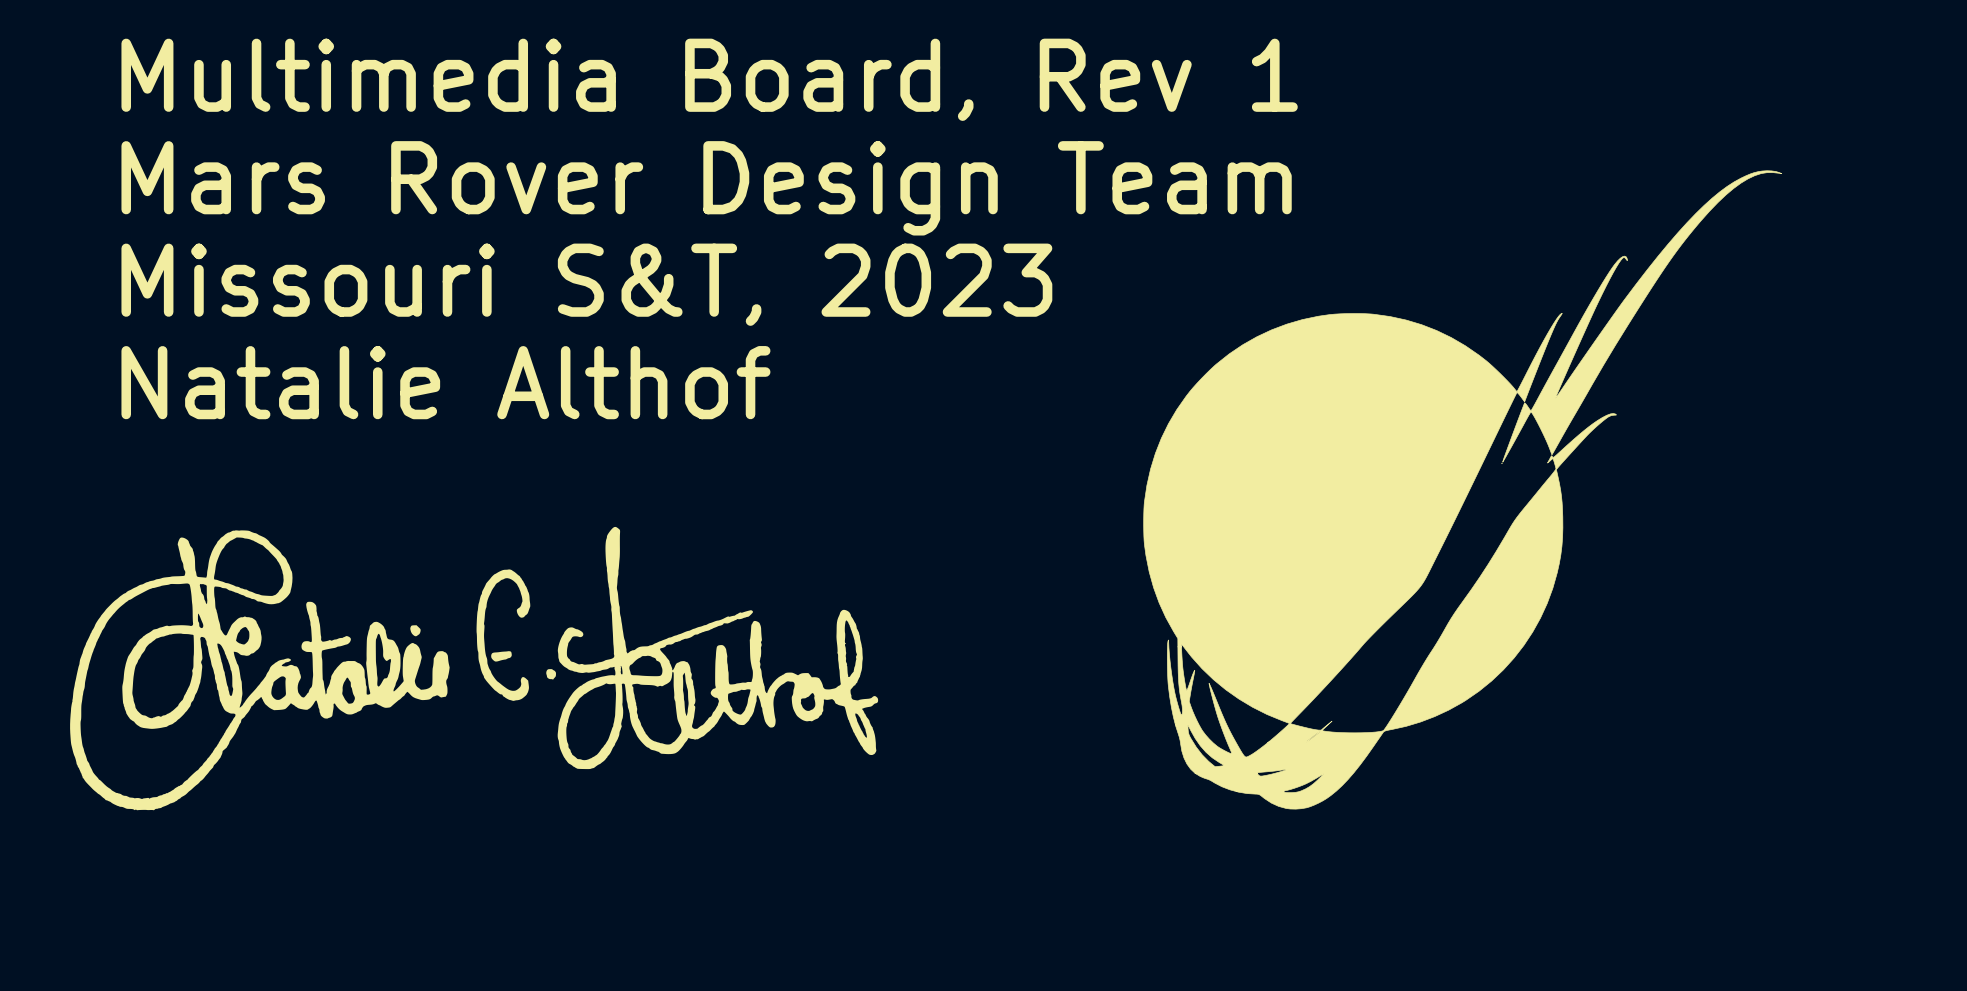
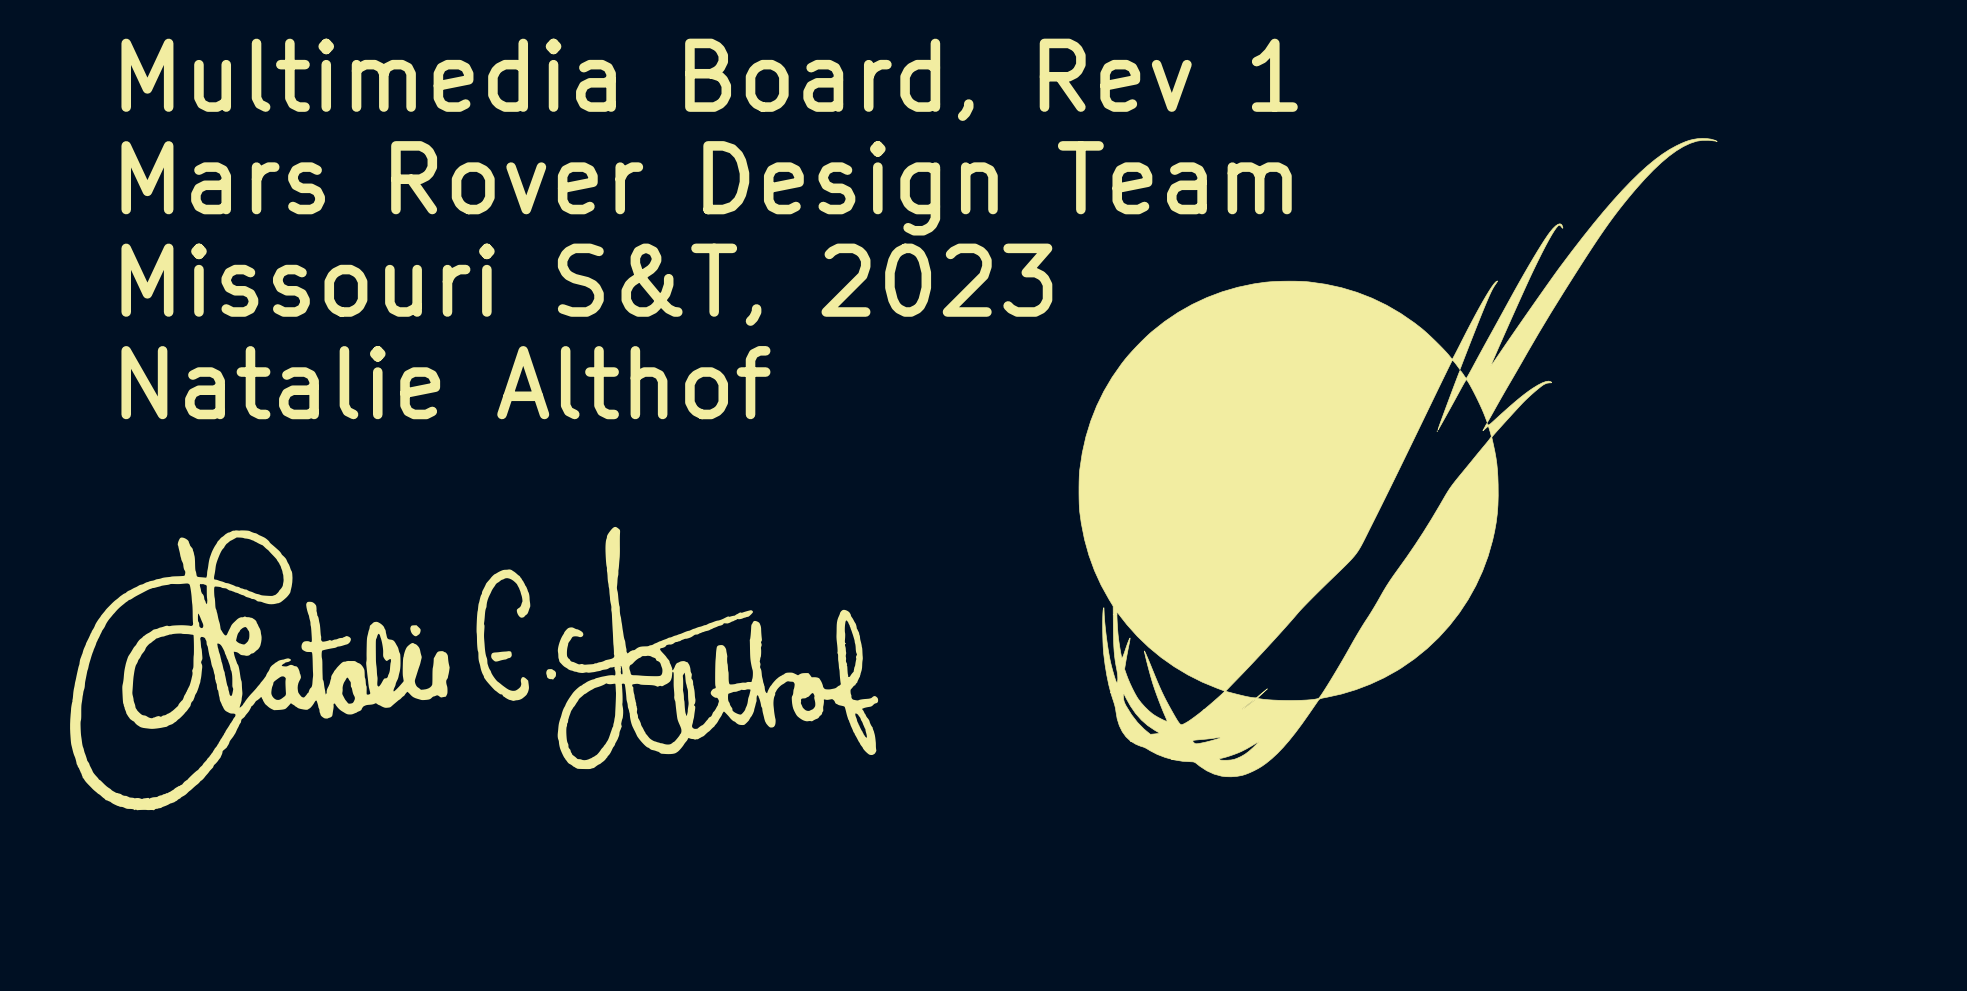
drawing position: (1462, 489) -> (1398, 457)

